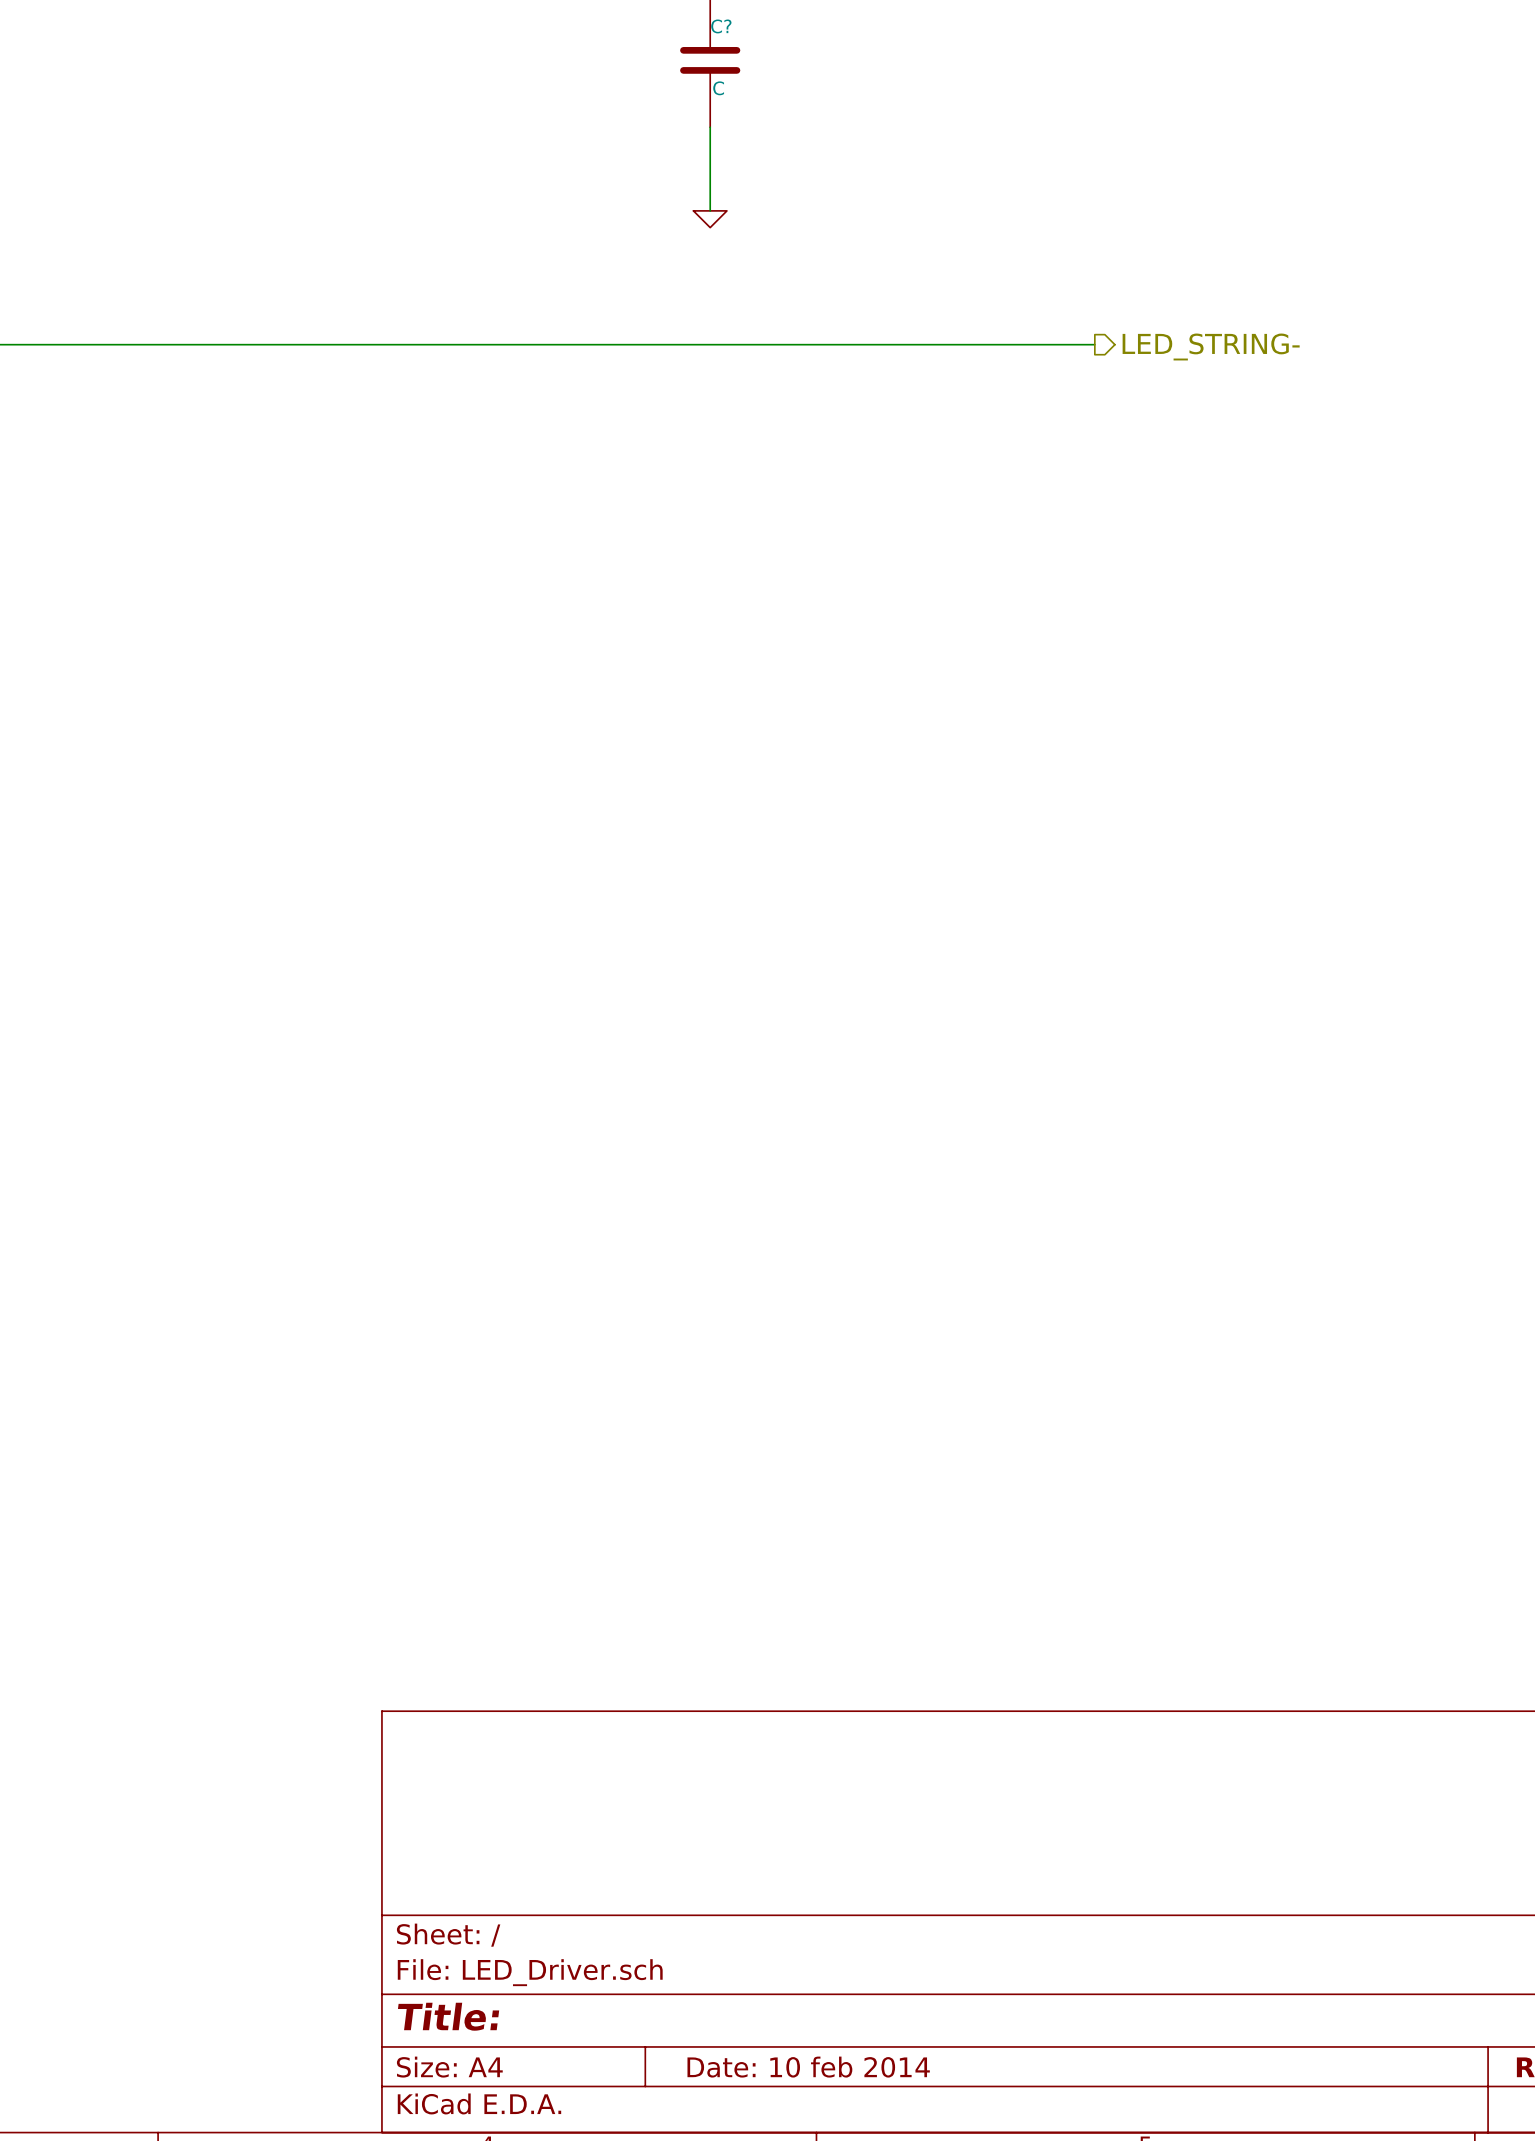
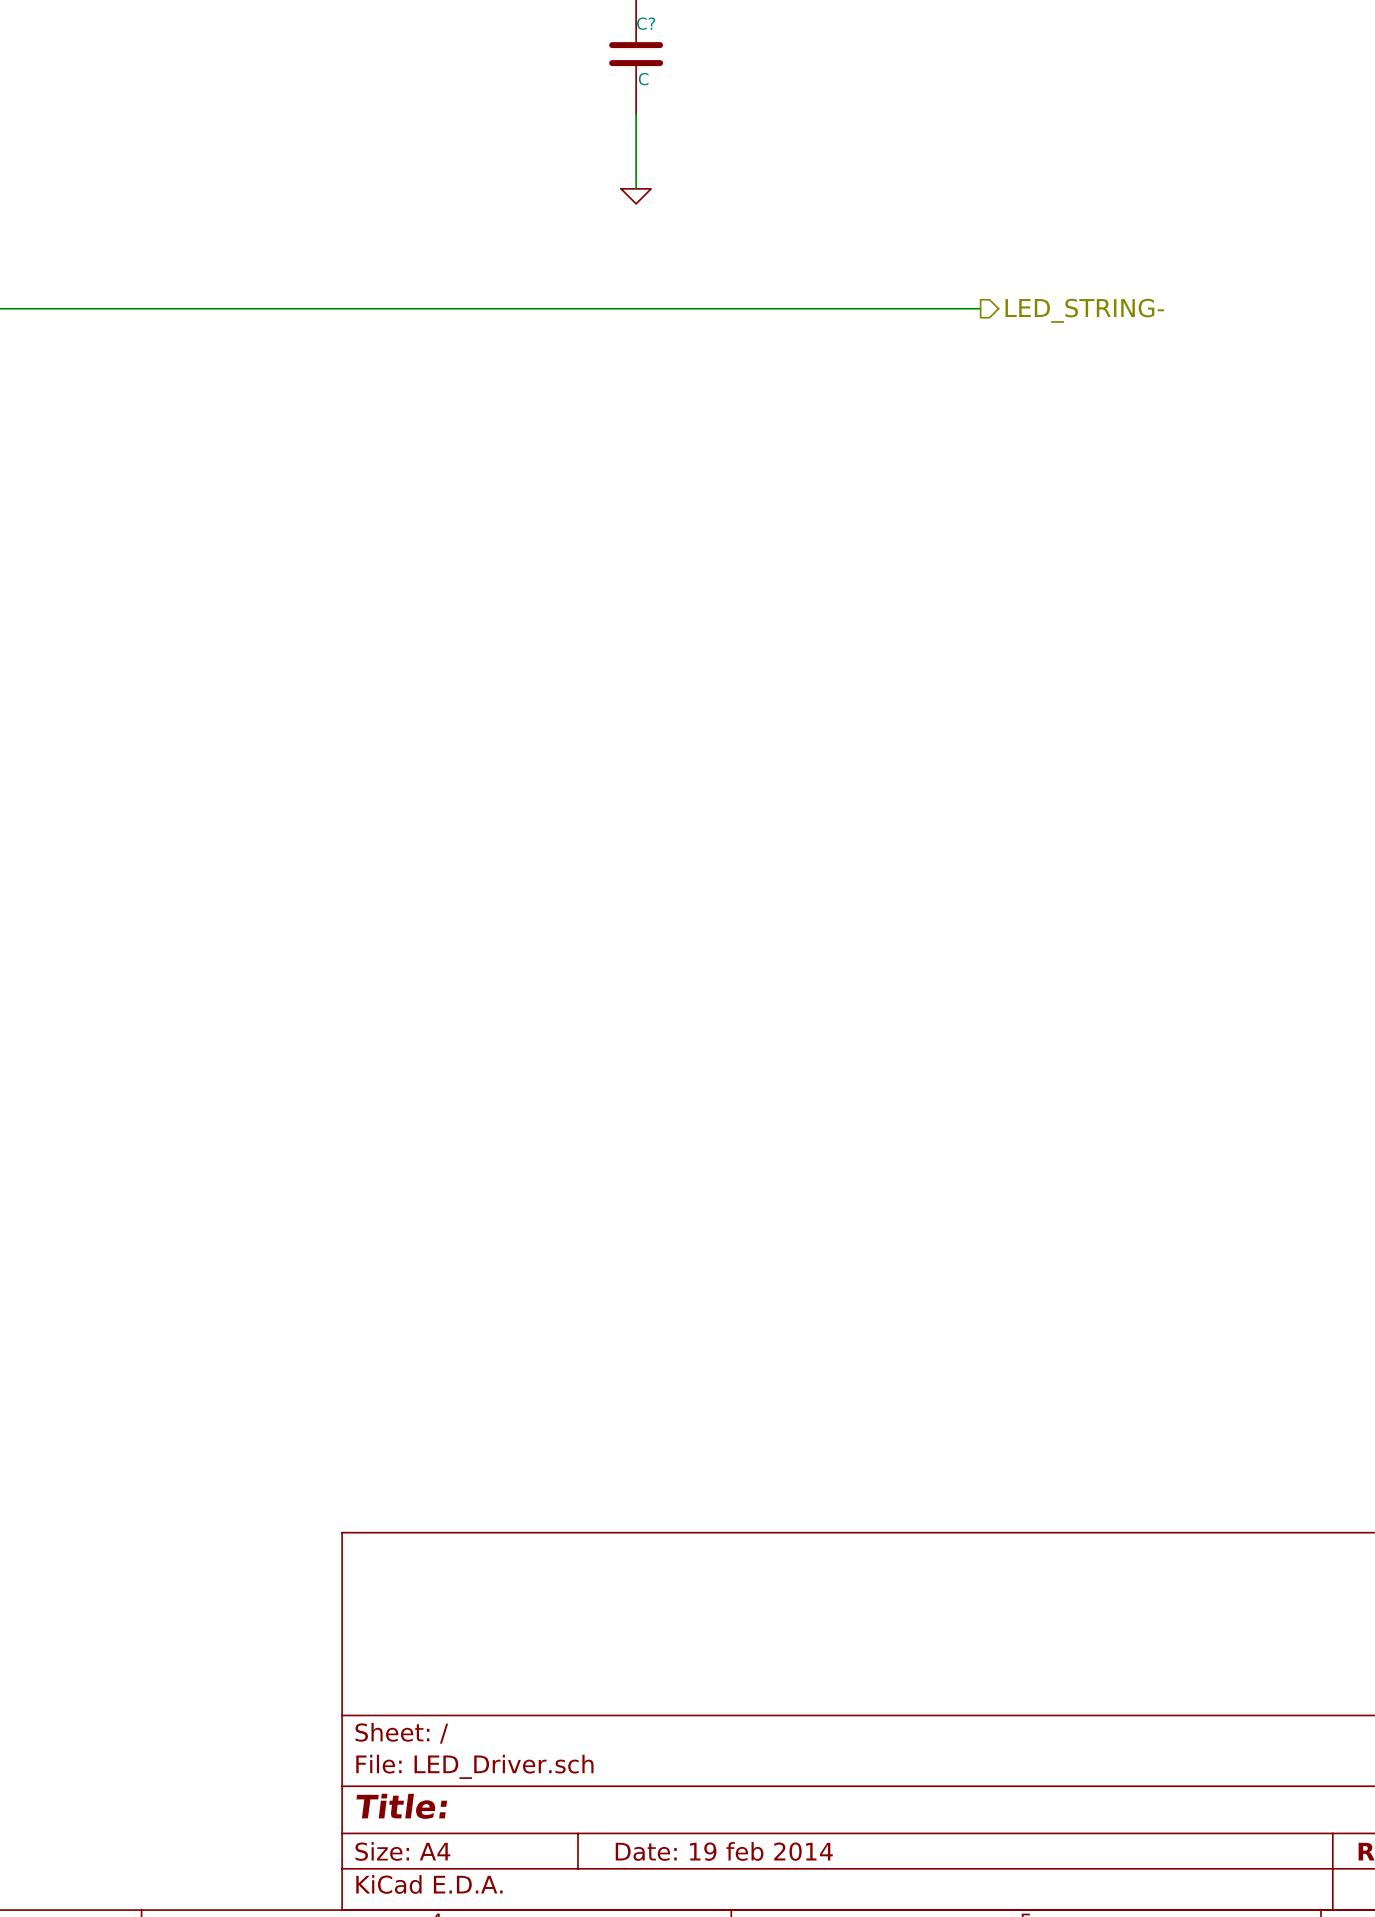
title block: Date: 10 feb 2014 (808, 2067) -> Date: 19 feb 2014 (724, 1851)

